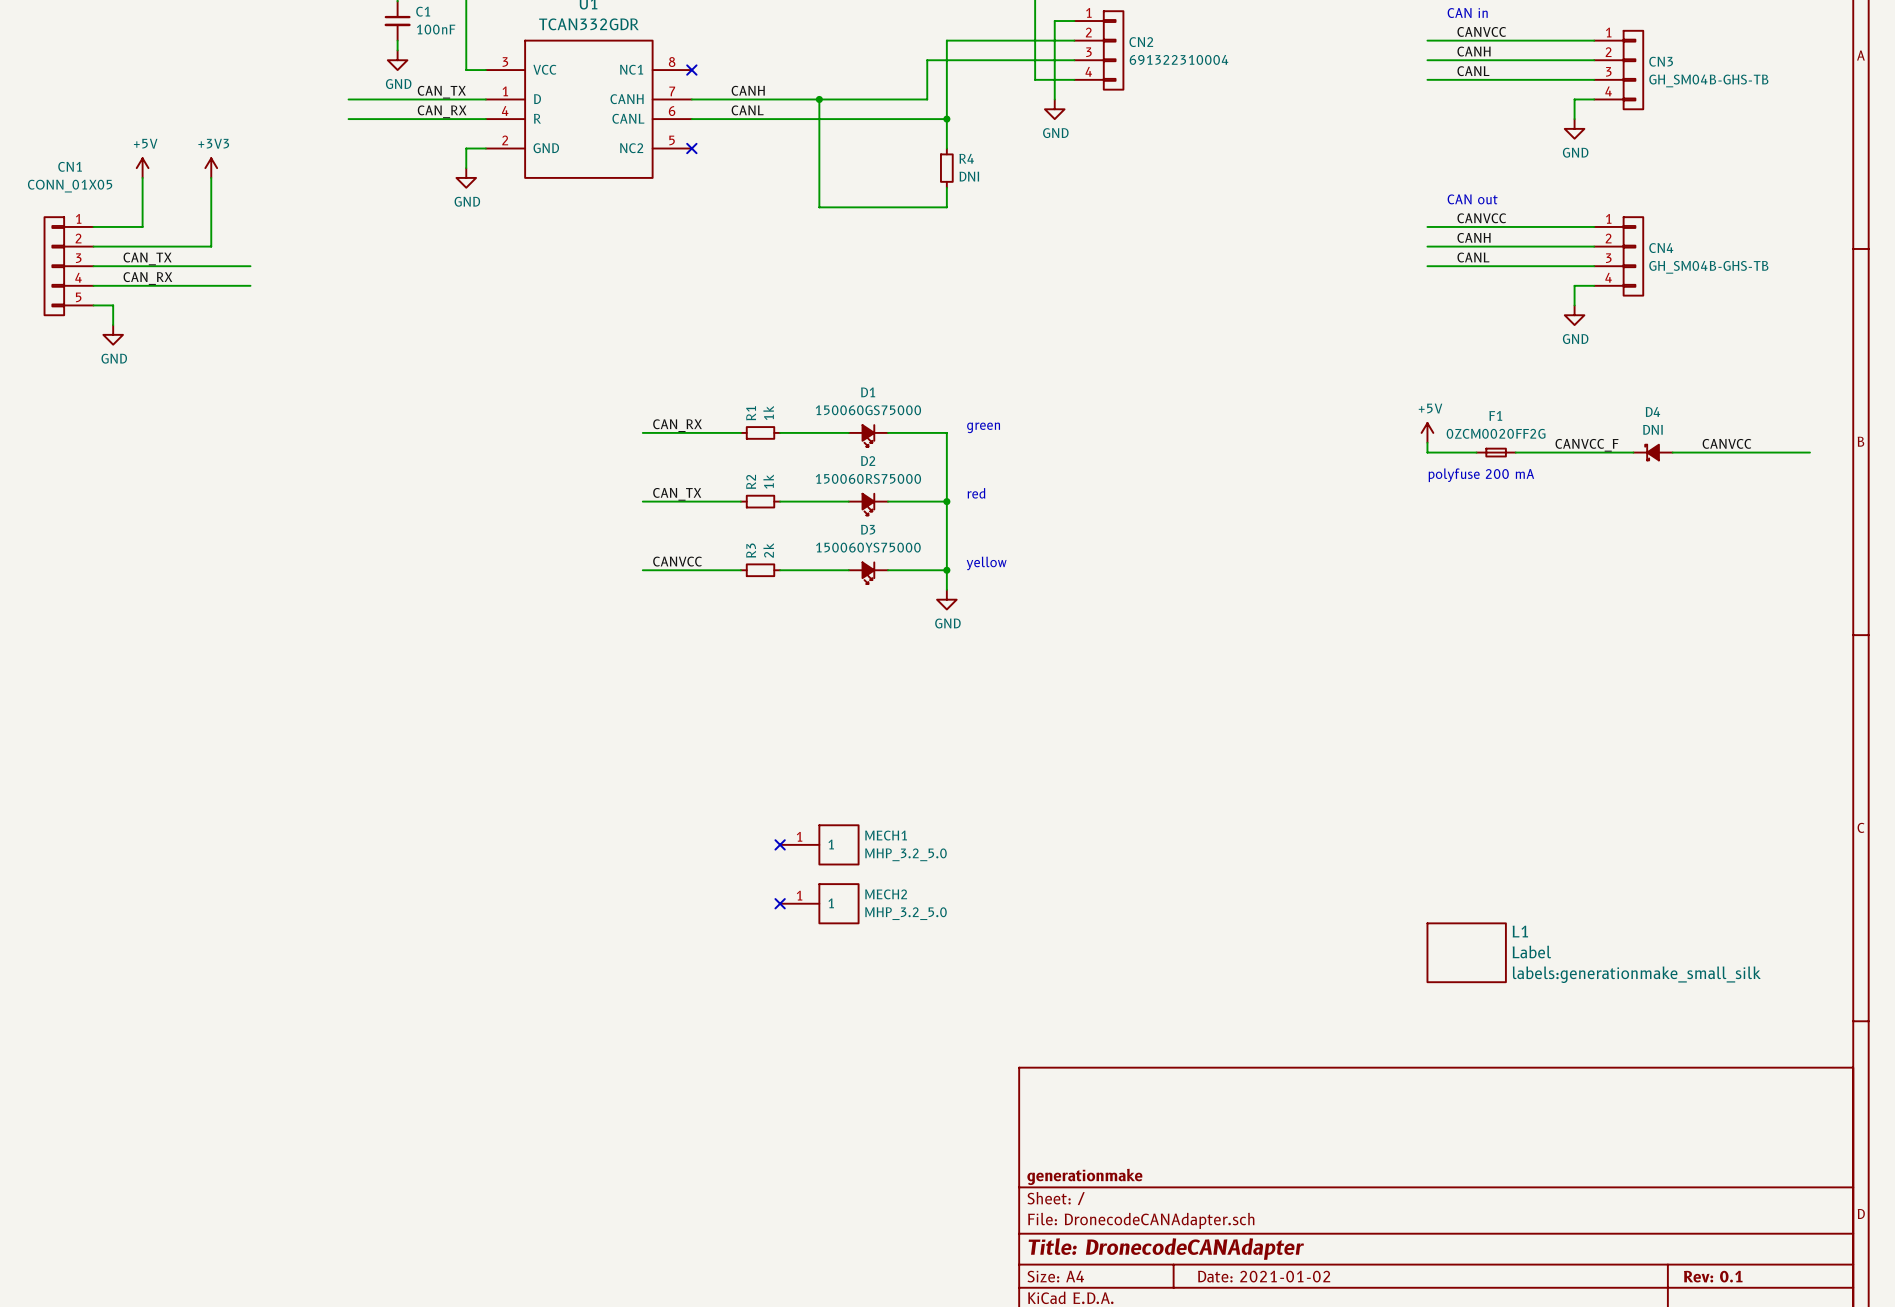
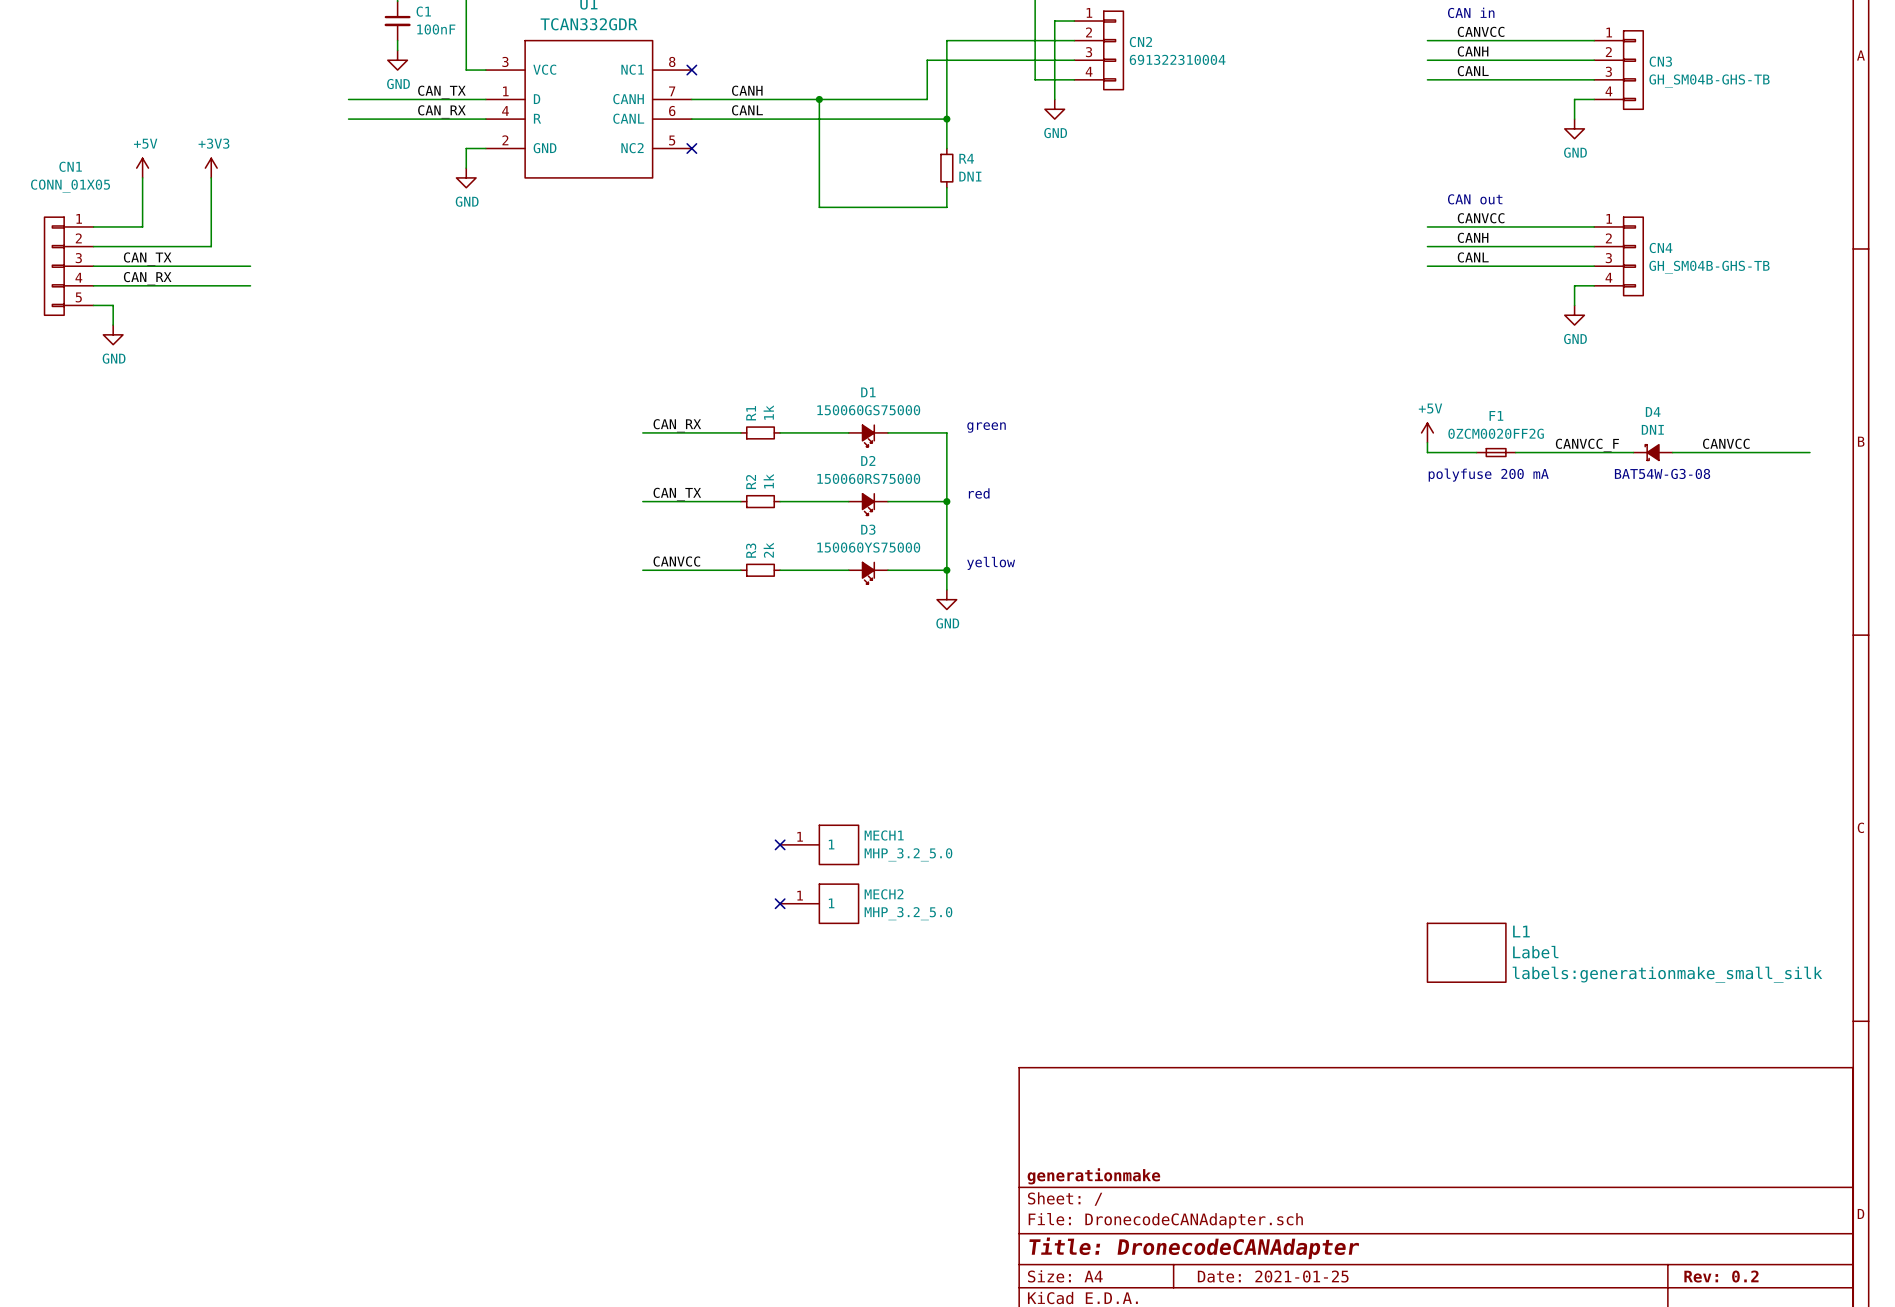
text: none -> BAT54W-G3-08 (1662, 473)
title block: Date: 2021-01-02 (1264, 1276) -> Date: 2021-01-25 (1273, 1276)
title block: Rev: 0.1 (1713, 1276) -> Rev: 0.2 (1721, 1276)

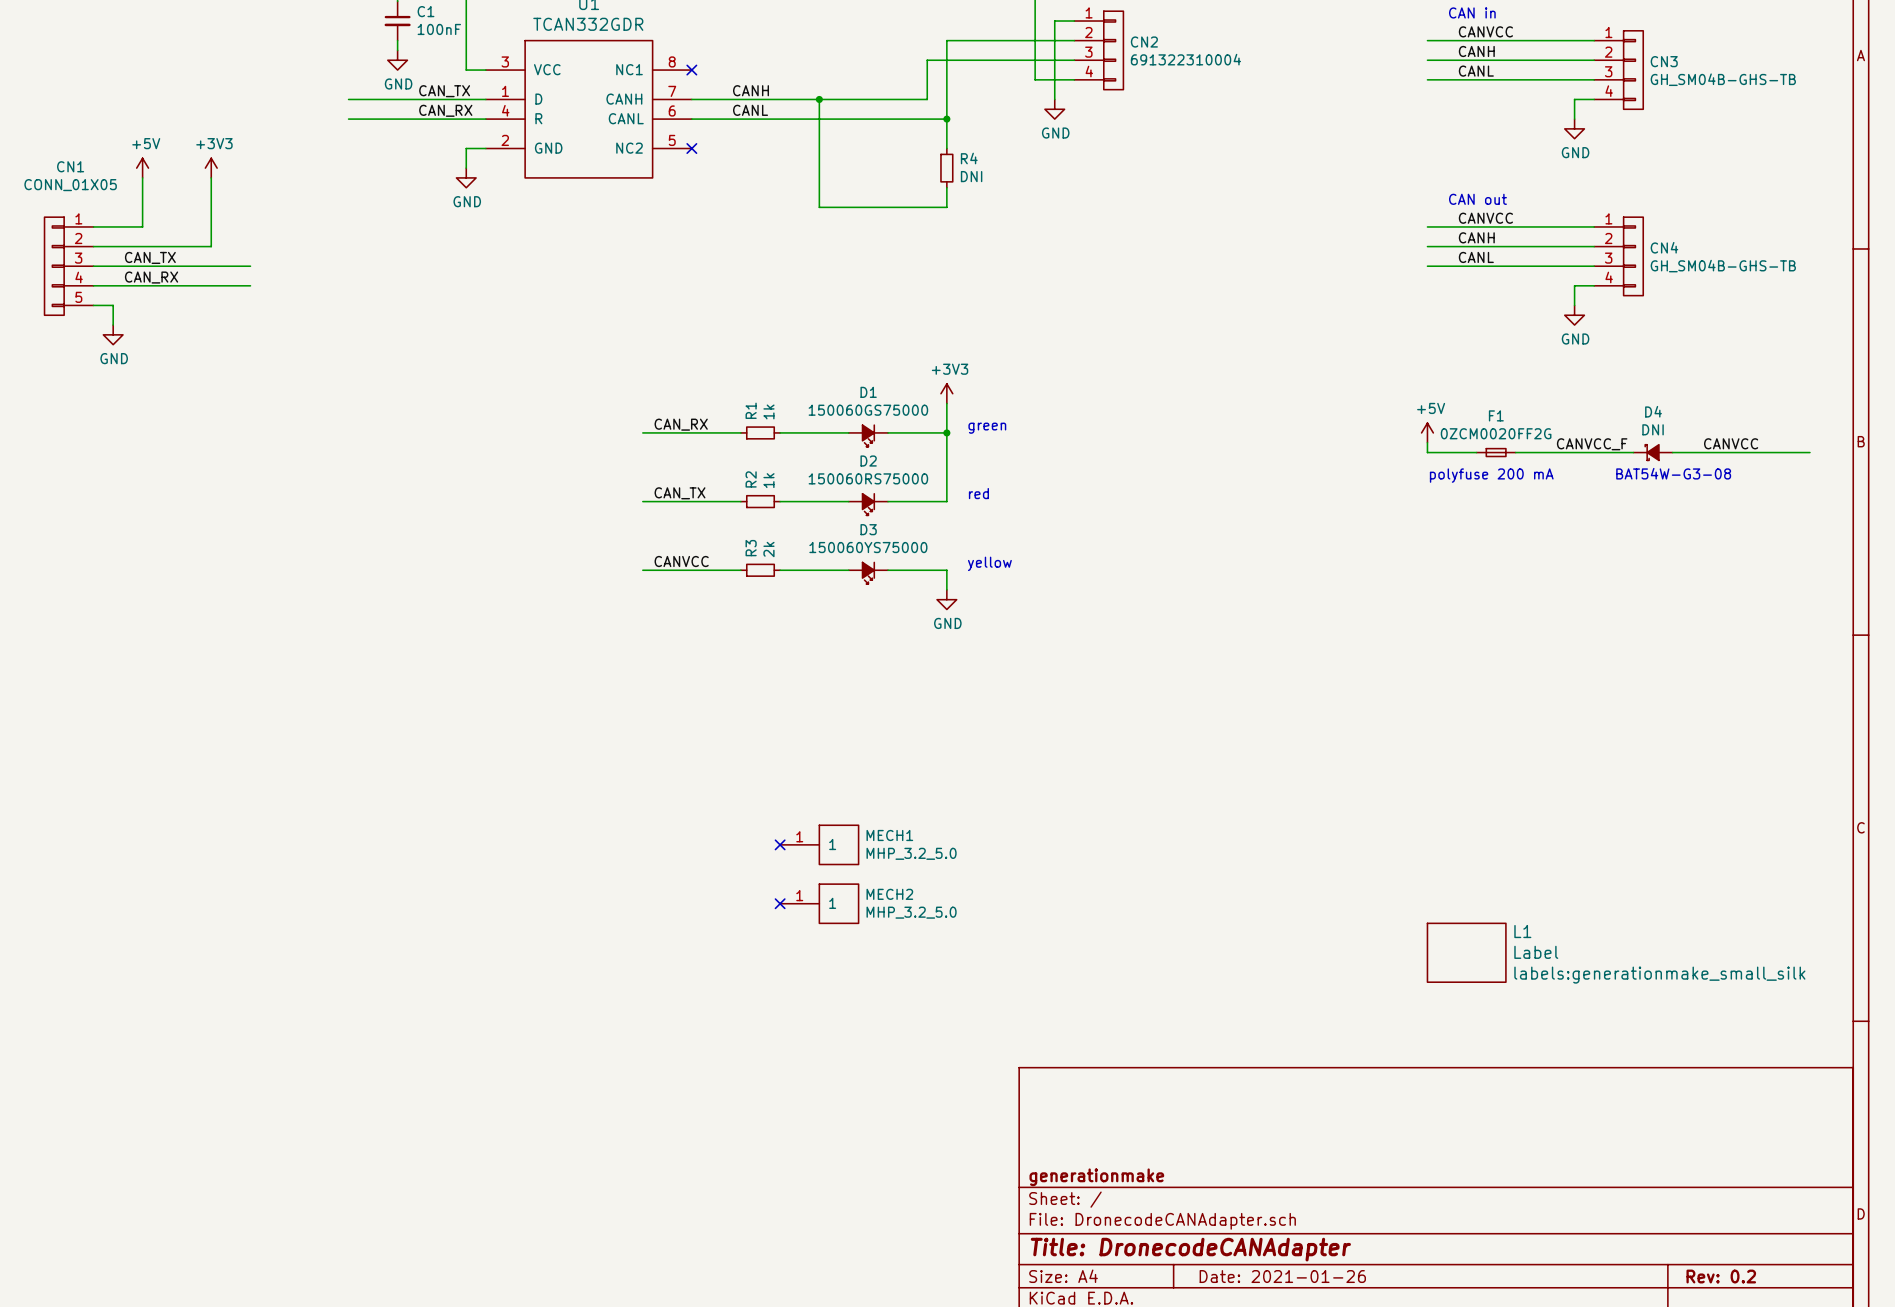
power symbol: none -> +3V3 (946, 393)
wire: none -> (946, 403) (946, 432)
junction: none -> (946, 432)
wire: (946, 501) (946, 570) -> none
junction: (946, 501) -> none
junction: (946, 570) -> none
title block: Date: 2021-01-25 (1273, 1276) -> Date: 2021-01-26 (1282, 1276)

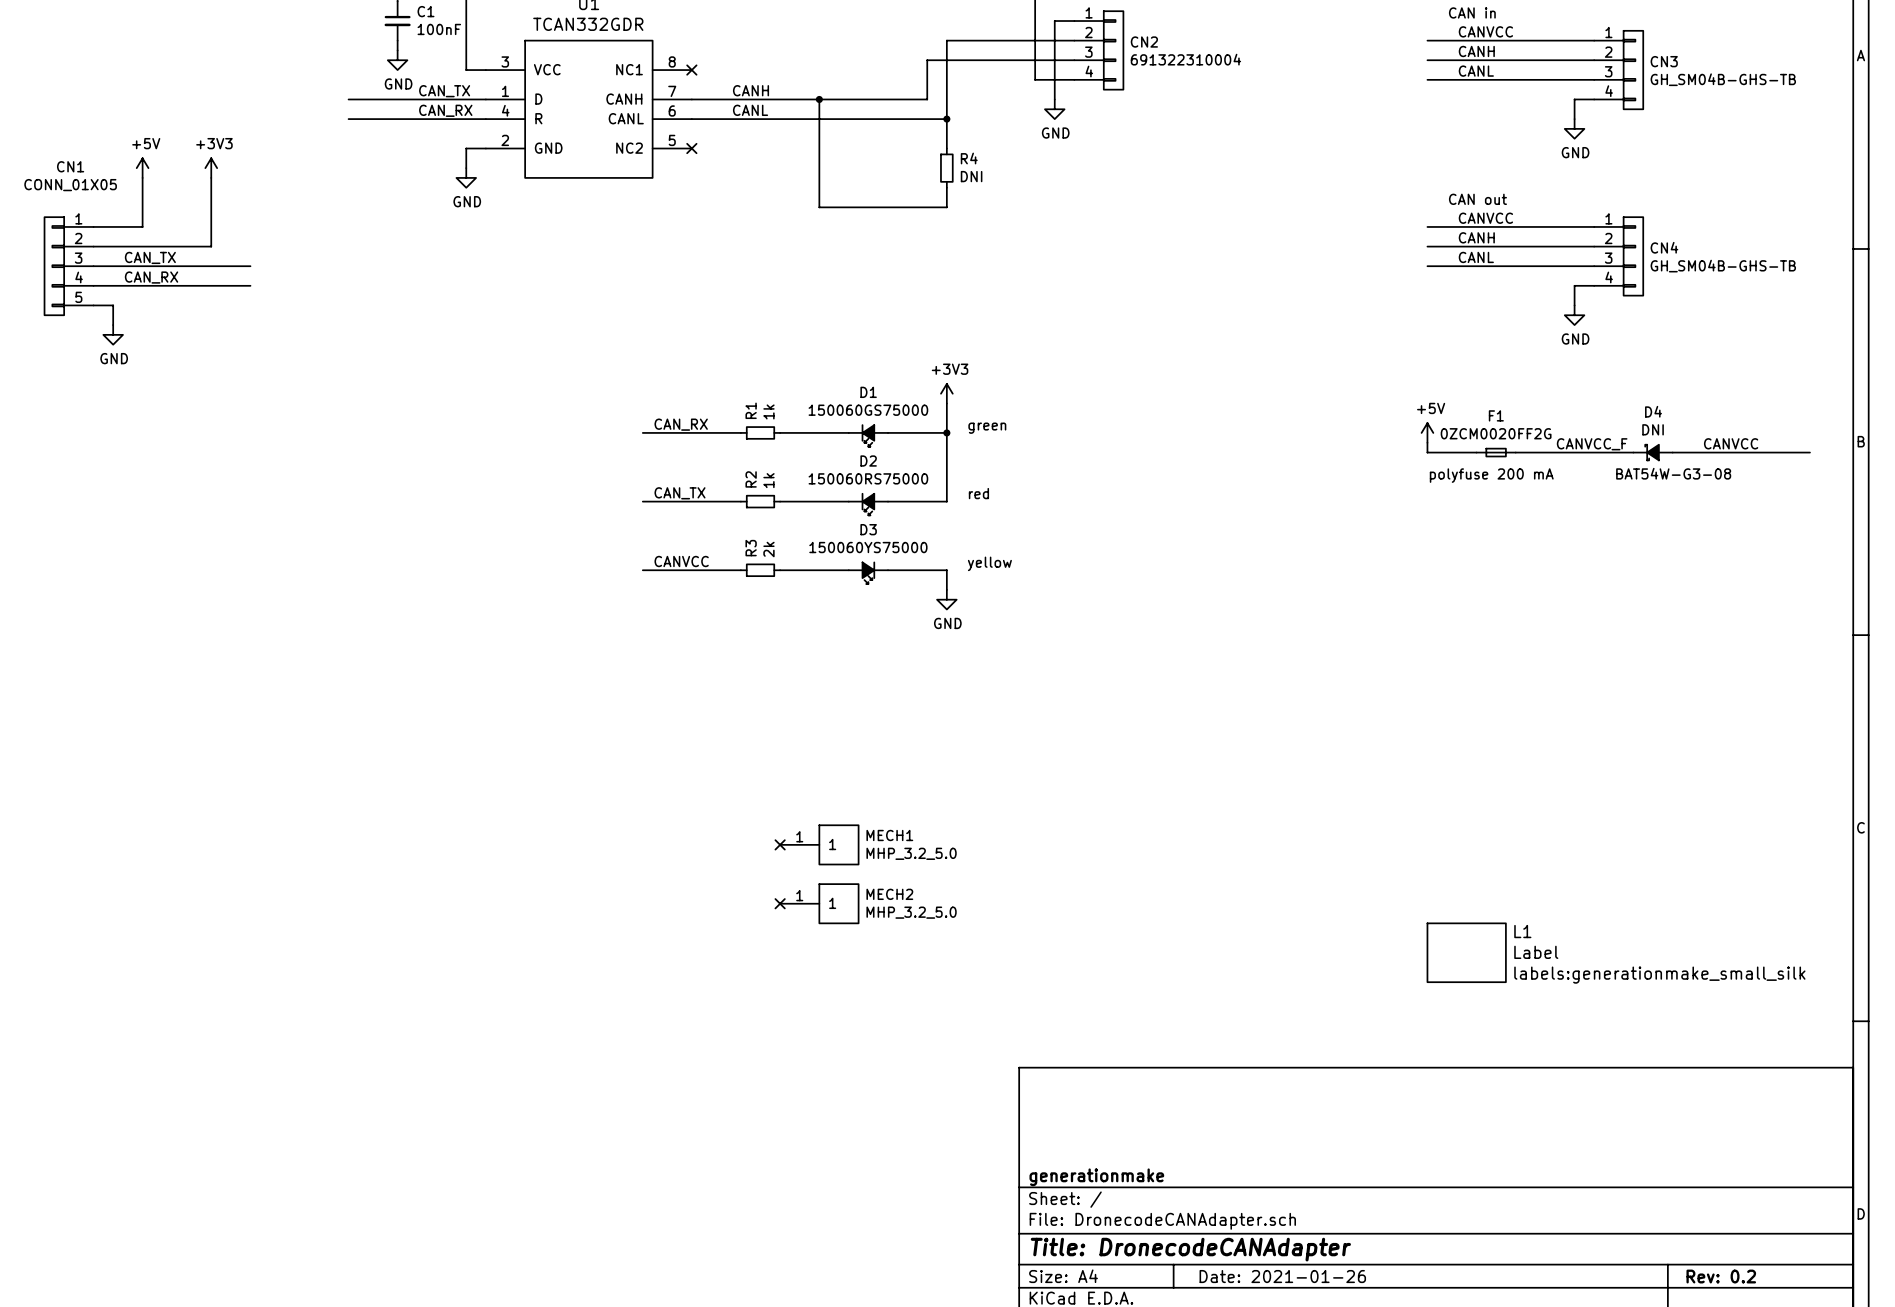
D1 flip: as is (868, 435) -> left-right (868, 435)
D2 flip: as is (868, 504) -> left-right (868, 504)

